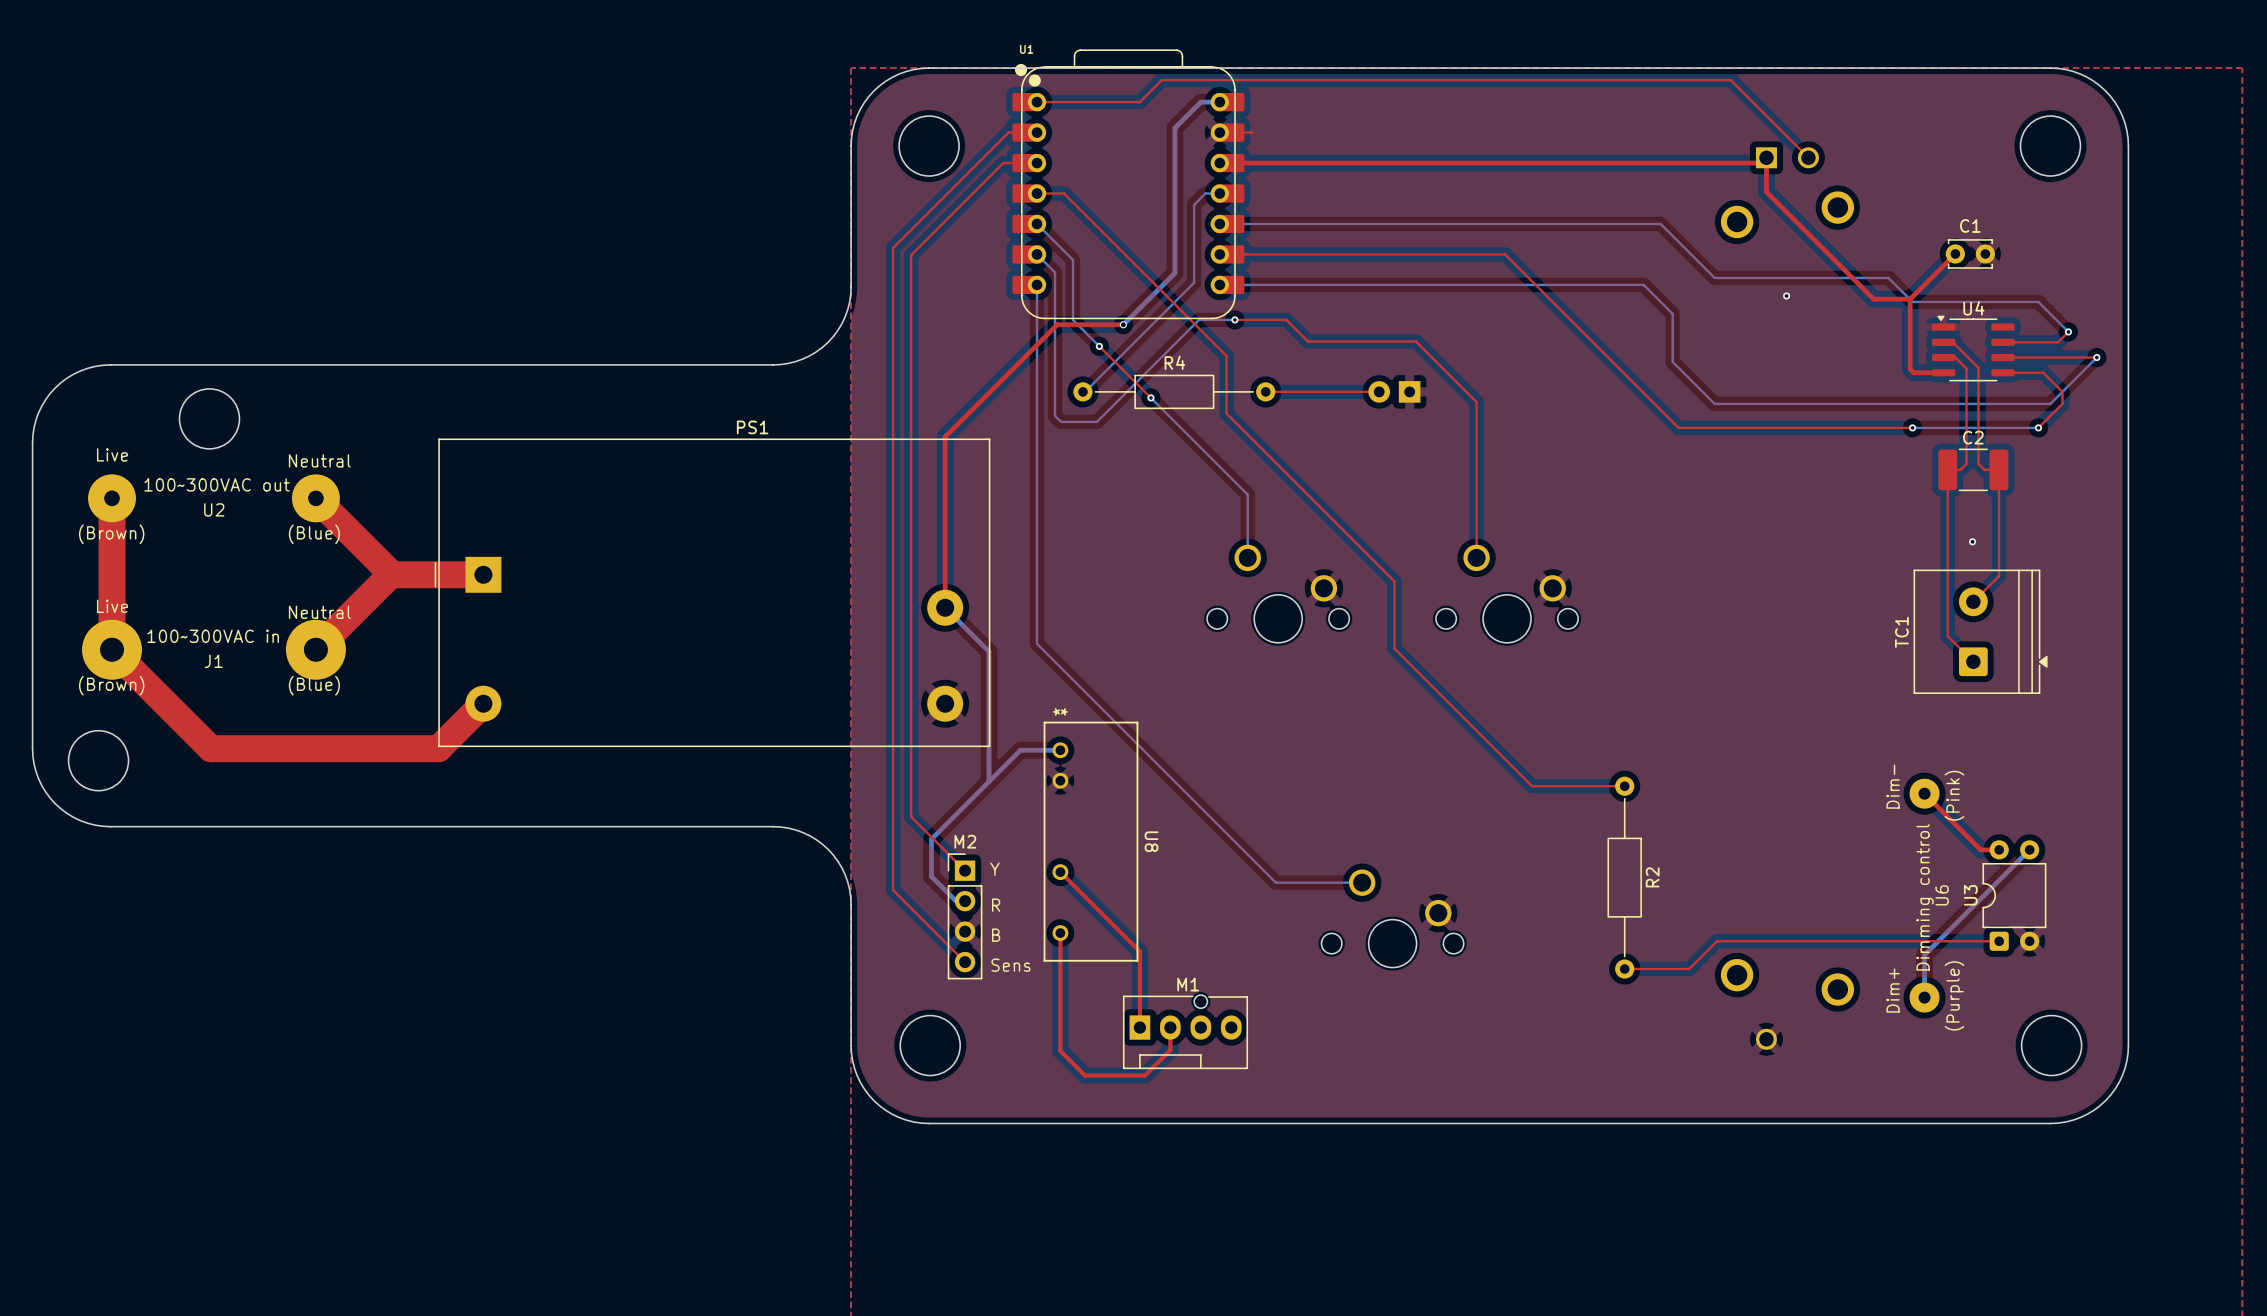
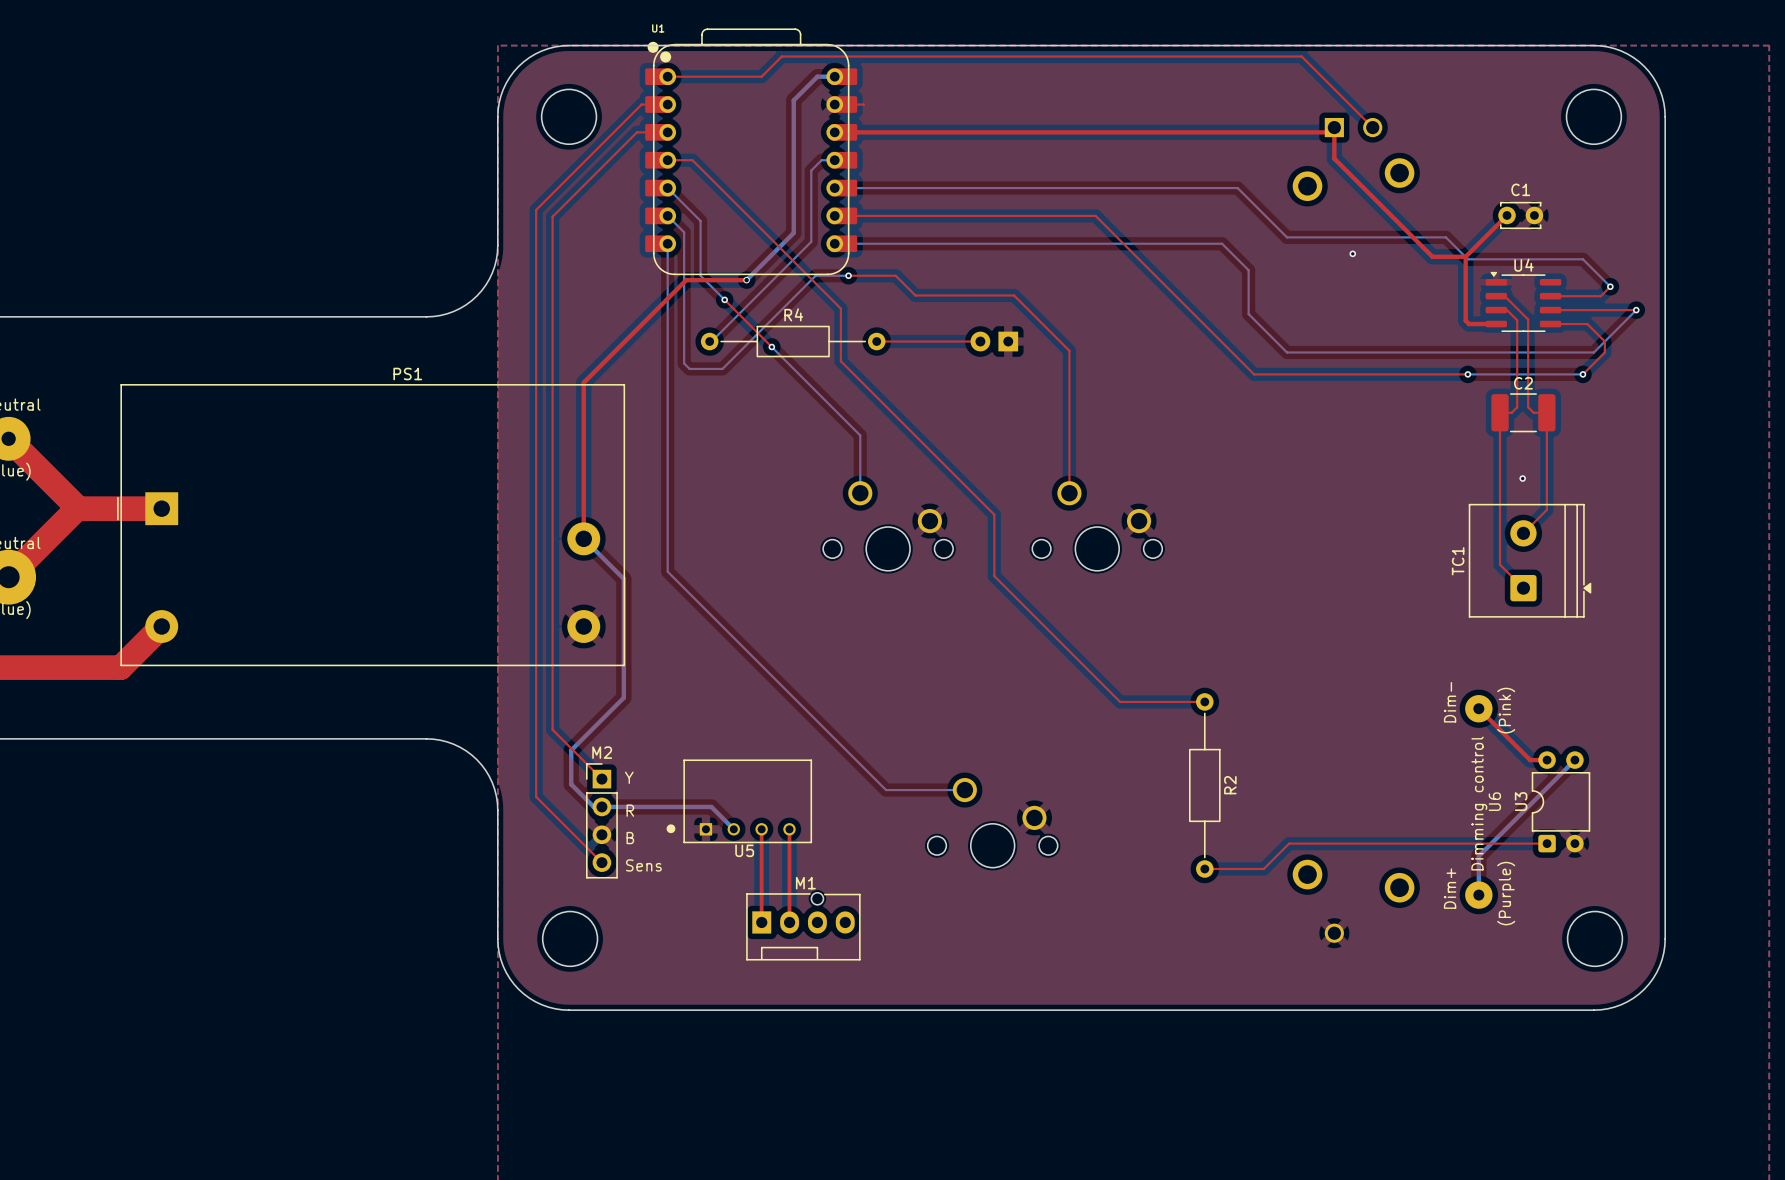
bottom track: (1060, 750) (1020, 750) (989, 781) -> none
U8: (1090, 841) -> none
top track: (1060, 872) (1139, 951) (1139, 1027) -> (761, 829) (761, 922)
U5: none -> (739, 801)
bottom track: none -> (601, 806) (711, 806) (733, 829)
top track: (1060, 933) (1060, 1050) (1084, 1075) (1144, 1075) (1170, 1050) (1170, 1027) -> (789, 829) (789, 922)

